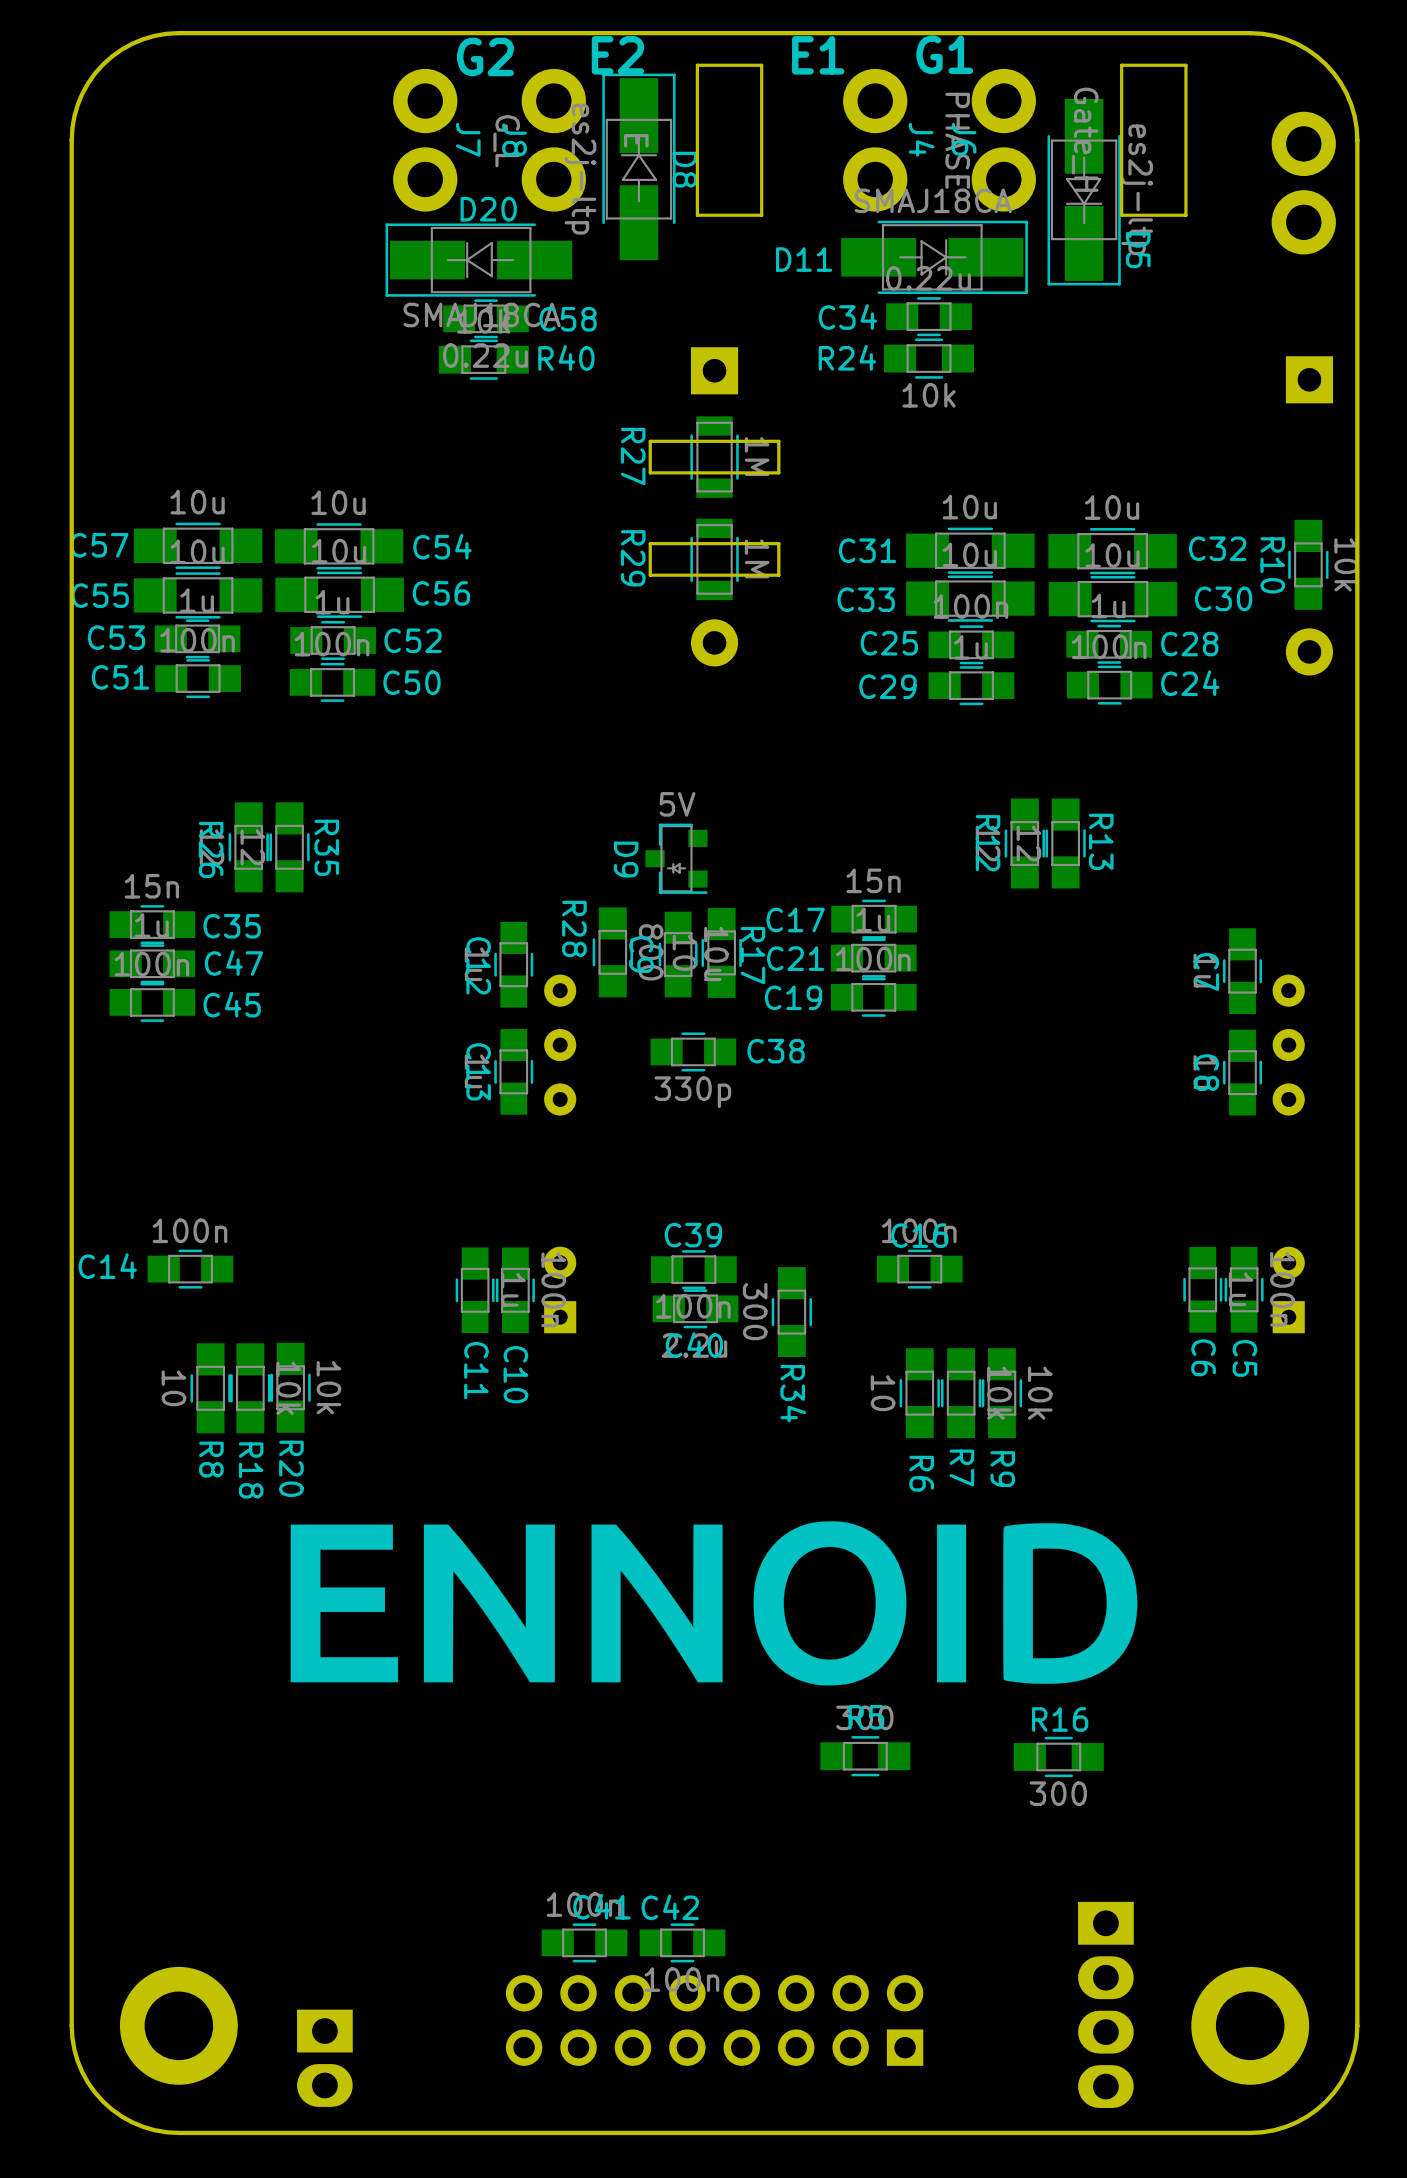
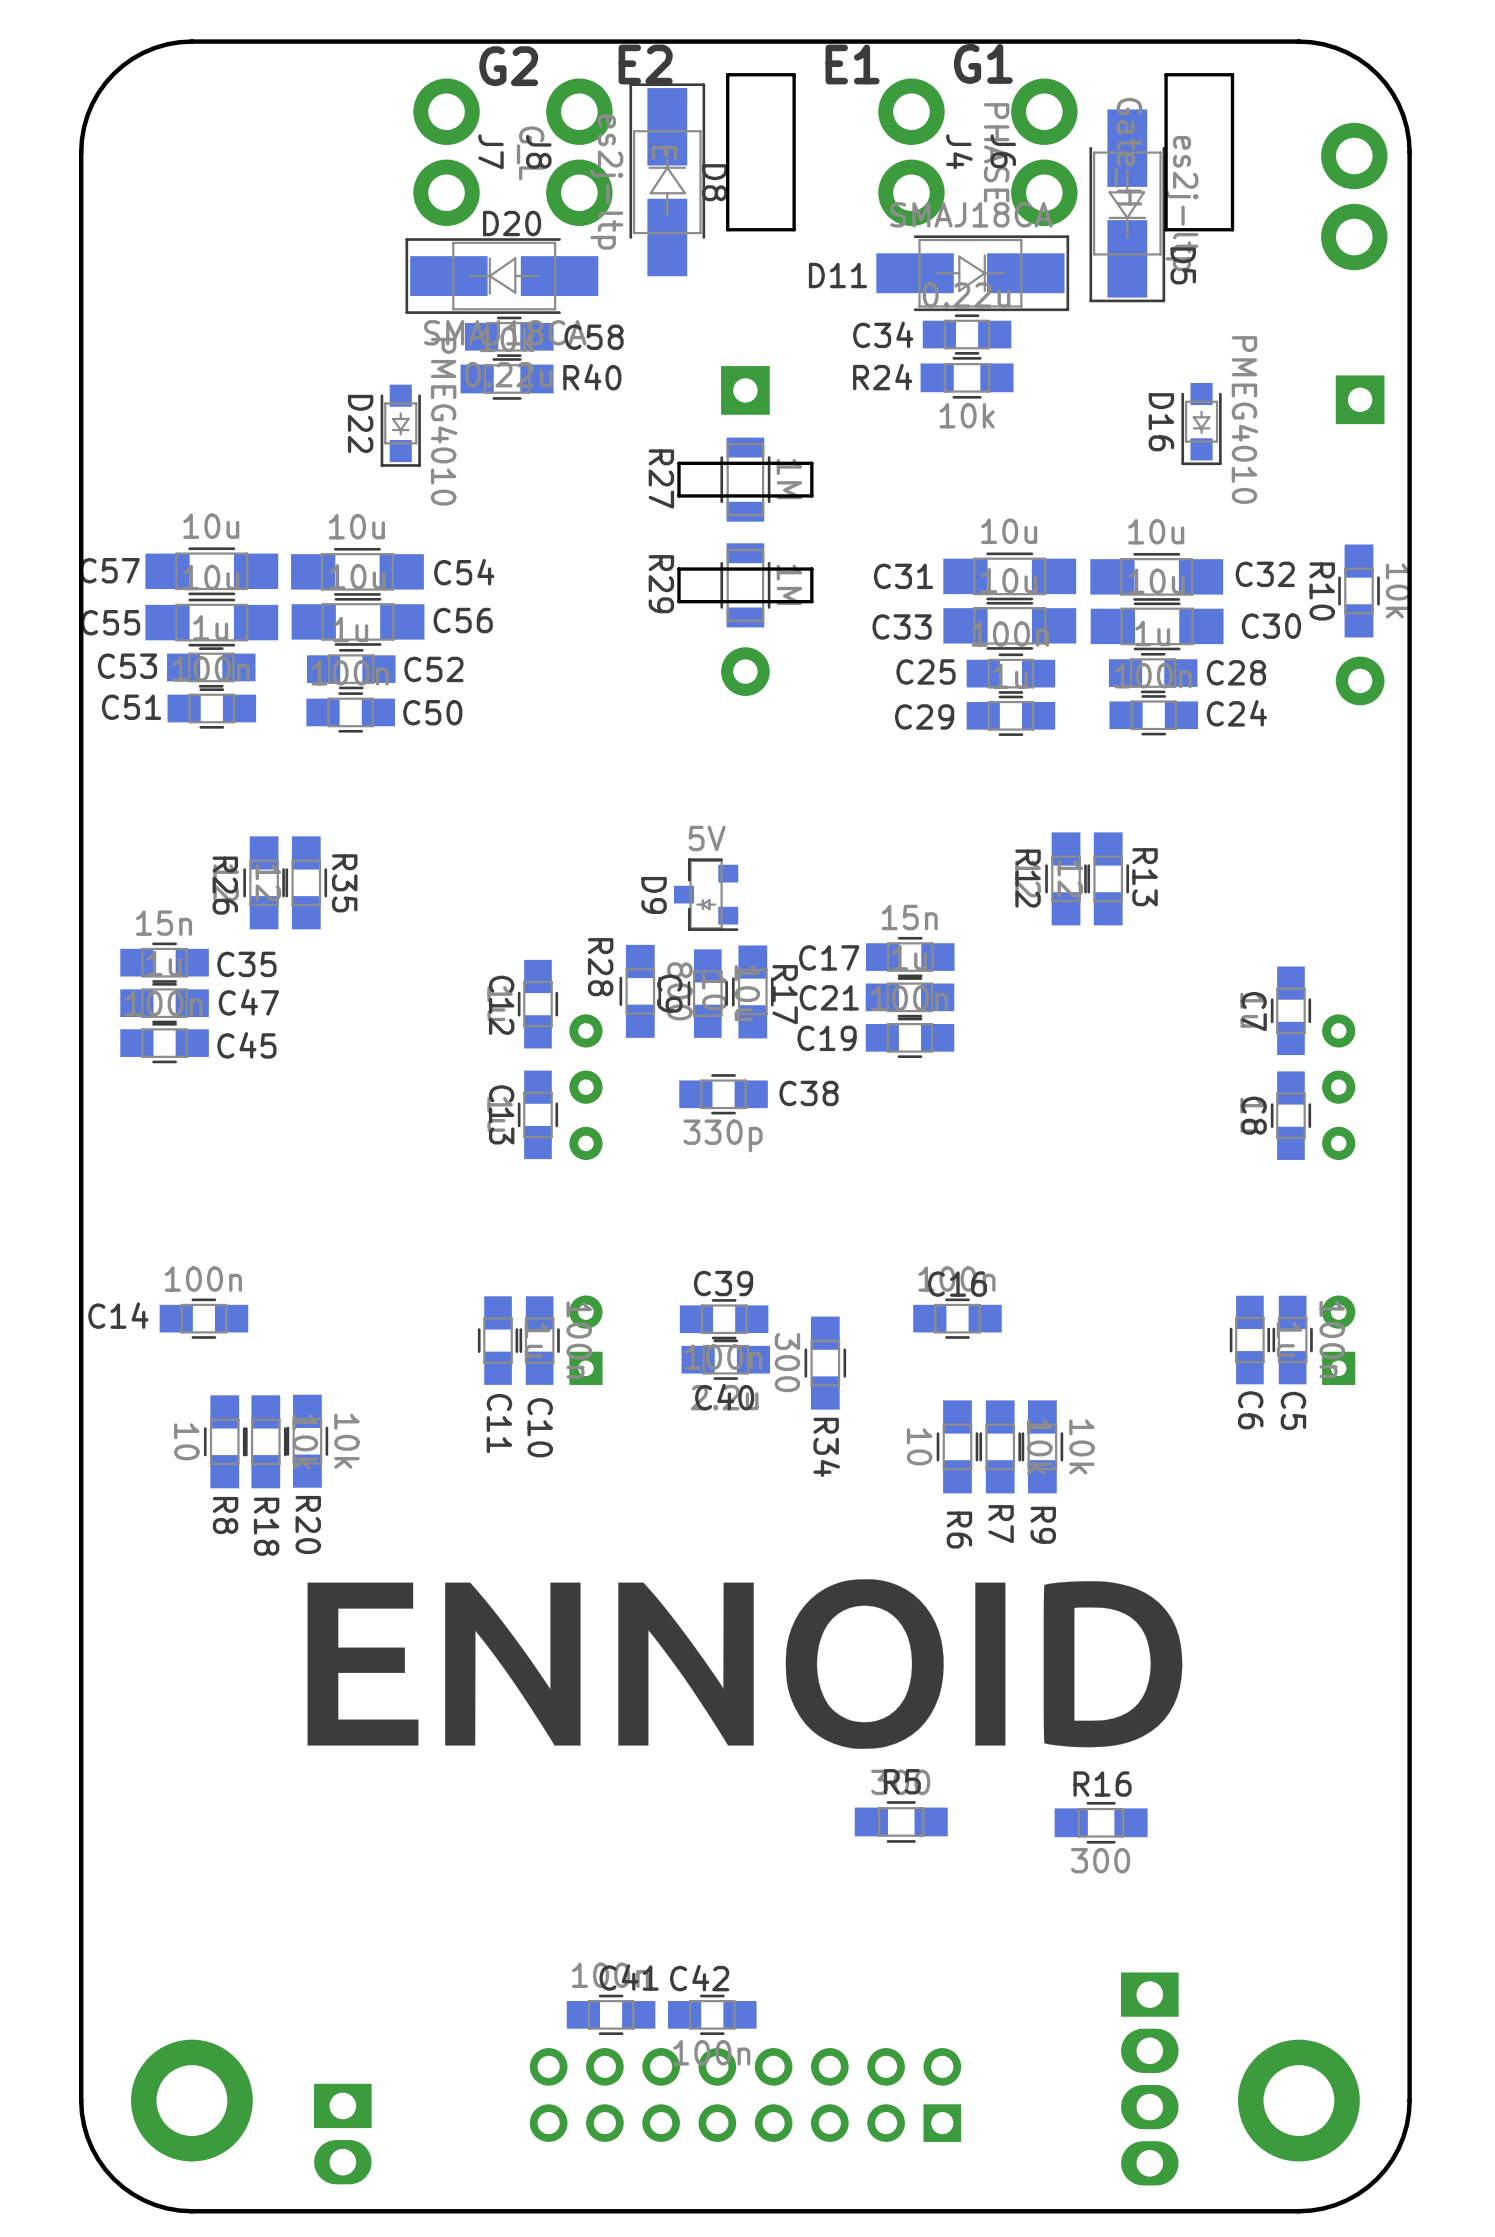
D16: none -> PMEG4010 (1201, 424)
D22: none -> PMEG4010 (400, 425)

